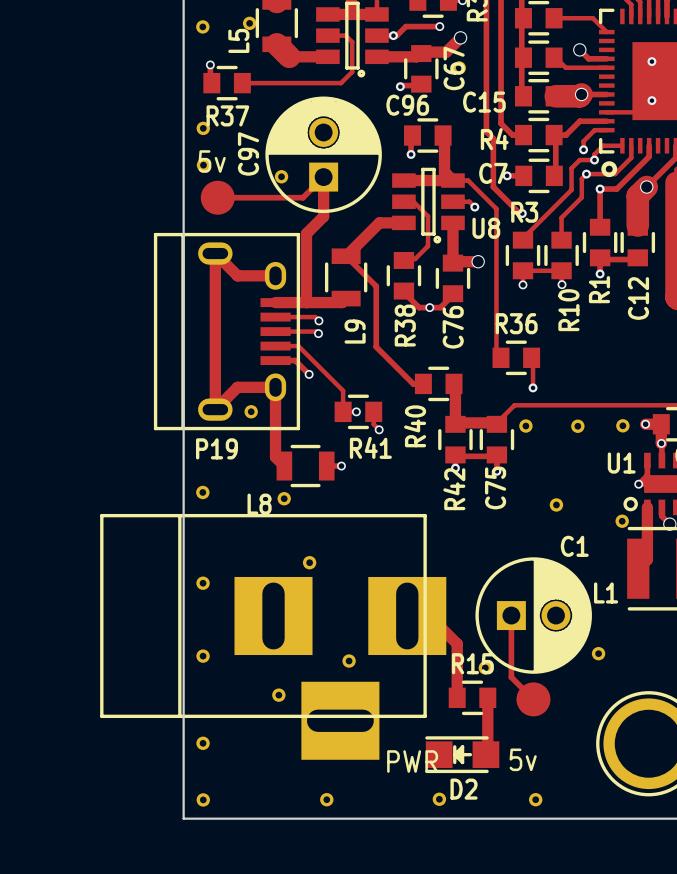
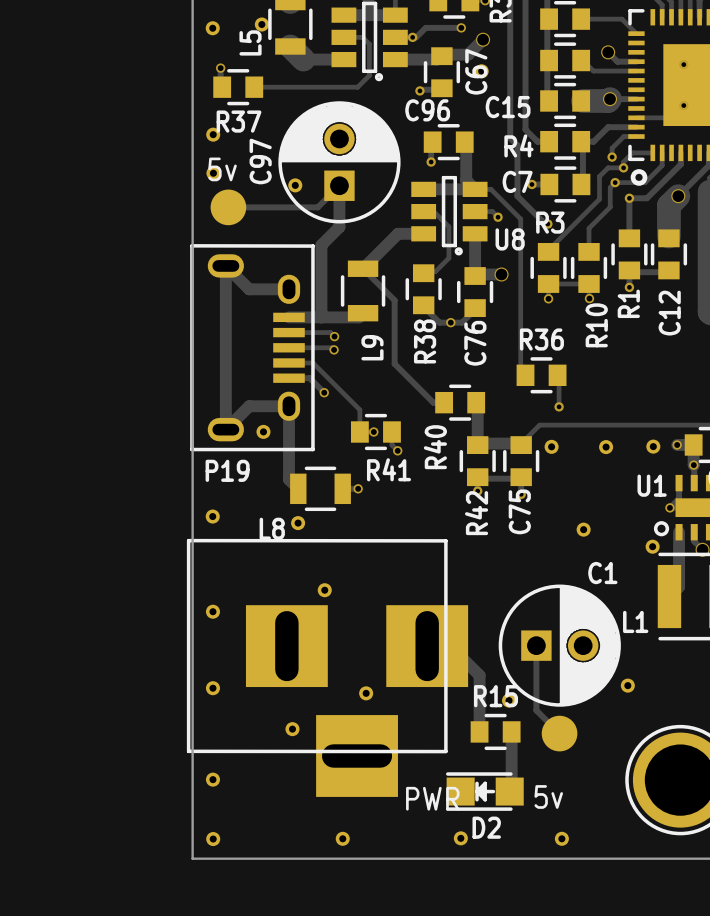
P19 footprint: [153, 232, 301, 431] -> [190, 244, 315, 452]
part: (273, 636) -> none
part: none -> (327, 667)

